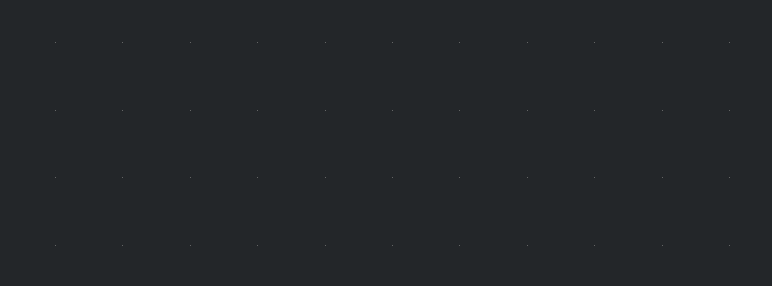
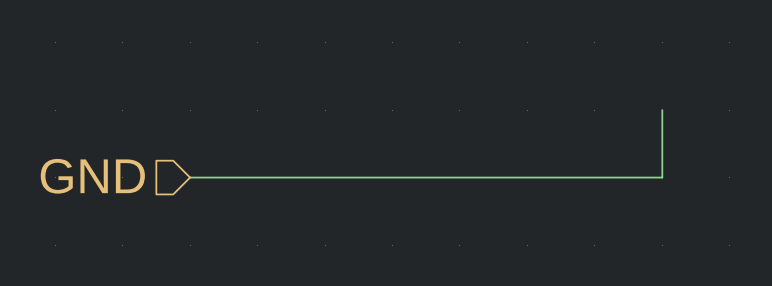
wire: none -> (662, 110) (662, 177) (190, 177)
hierarchical label: none -> GND (92, 176)

